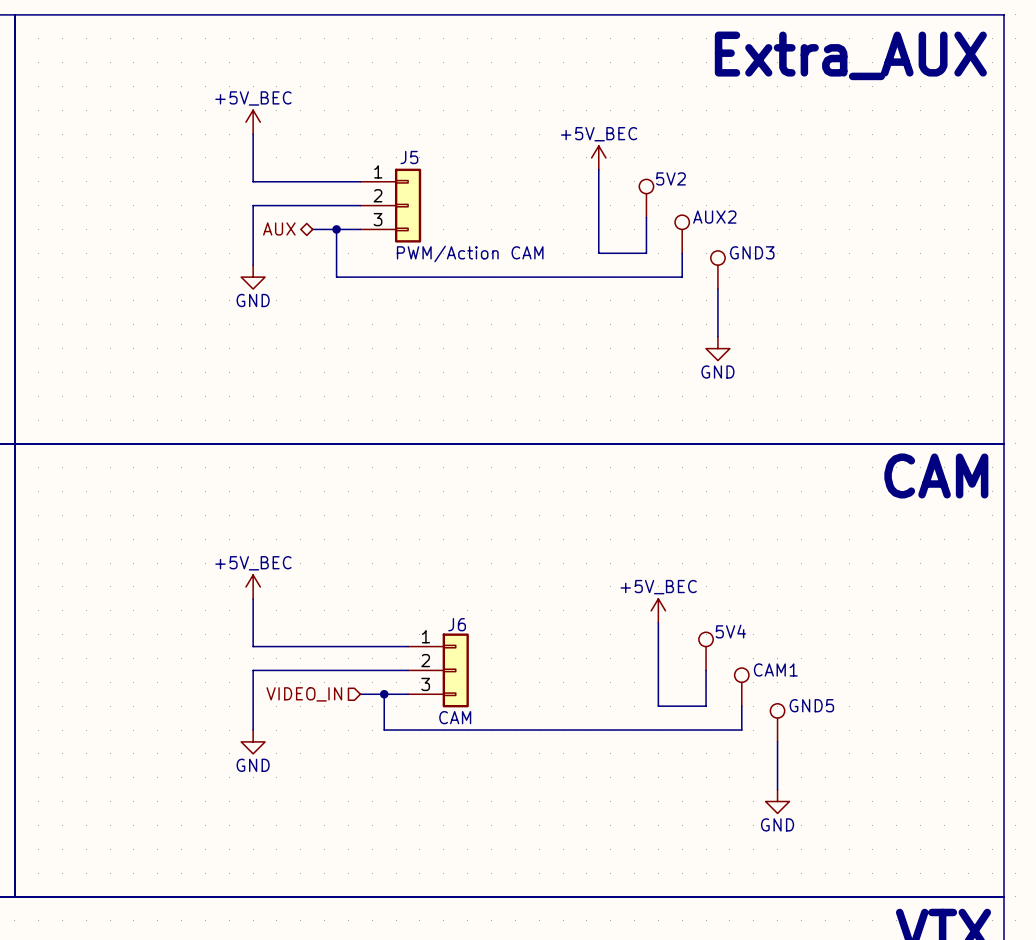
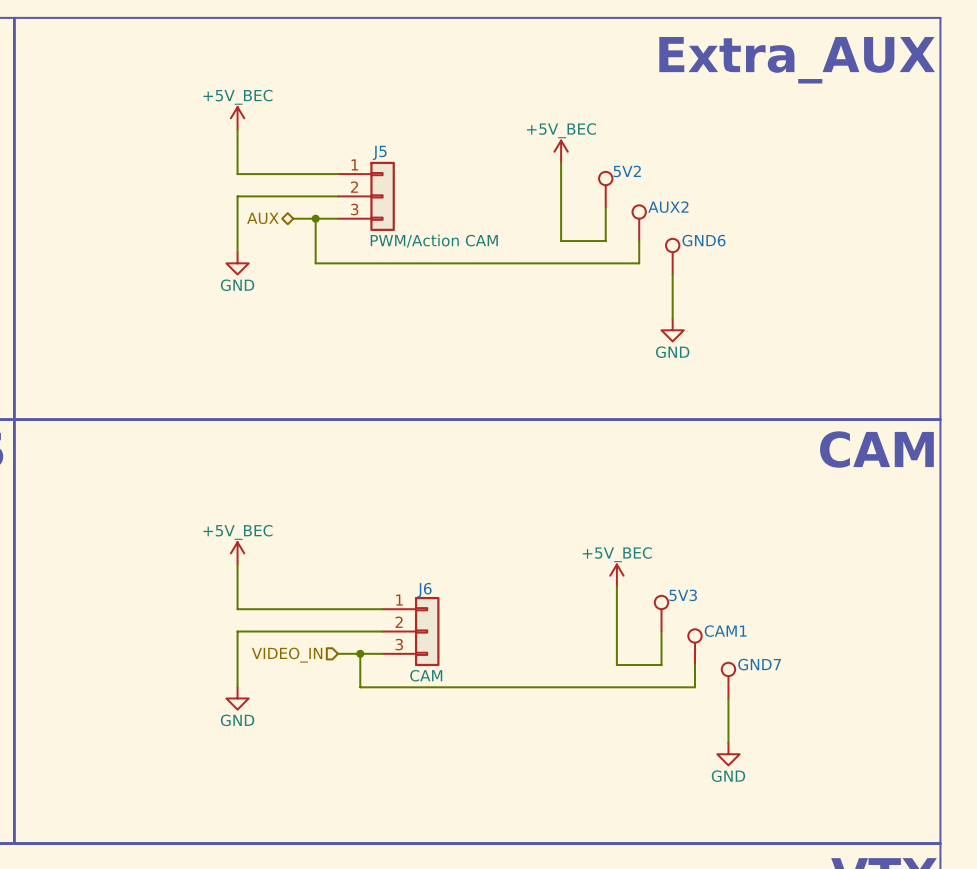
GND3 name: GND3 (752, 252) -> GND6 (703, 240)
5V4 name: 5V4 (730, 631) -> 5V3 (683, 595)
GND5 name: GND5 (811, 705) -> GND7 (759, 664)

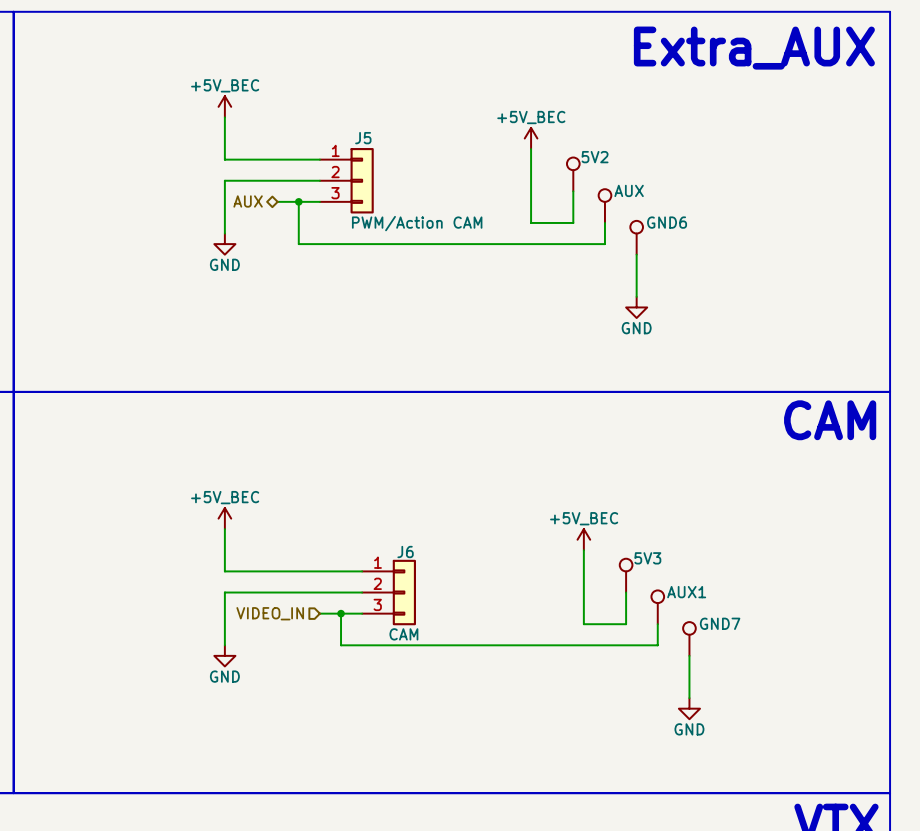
AUX2 name: AUX2 (668, 207) -> AUX (629, 190)
CAM1 name: CAM1 (725, 631) -> AUX1 (686, 592)

